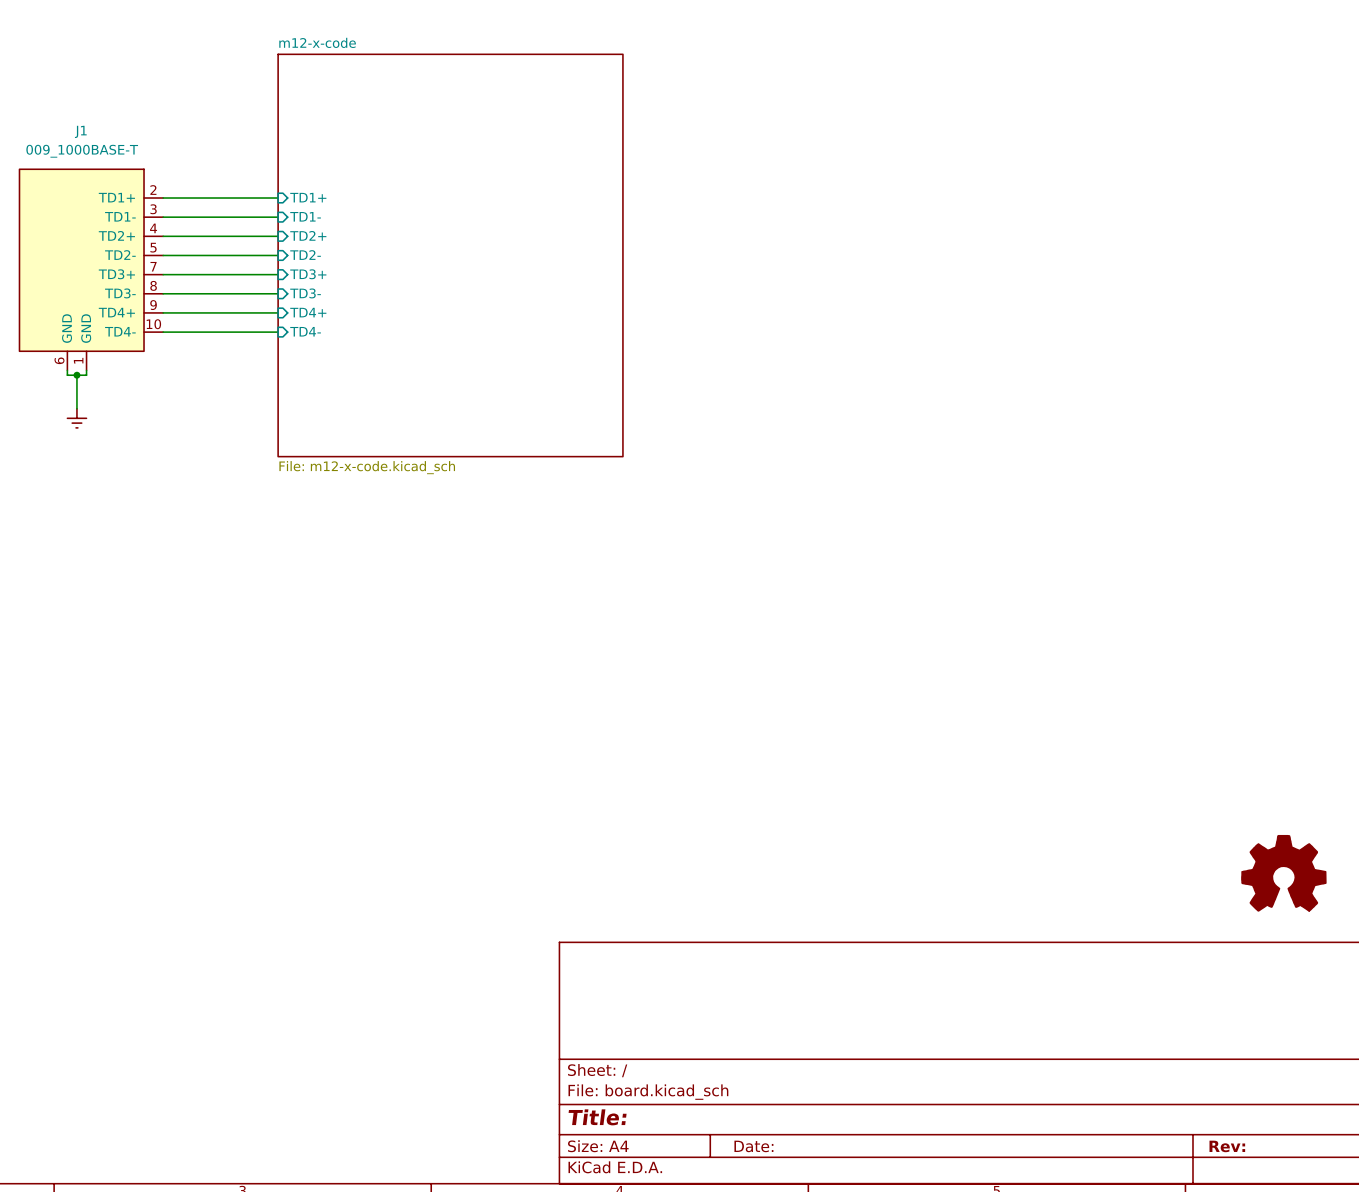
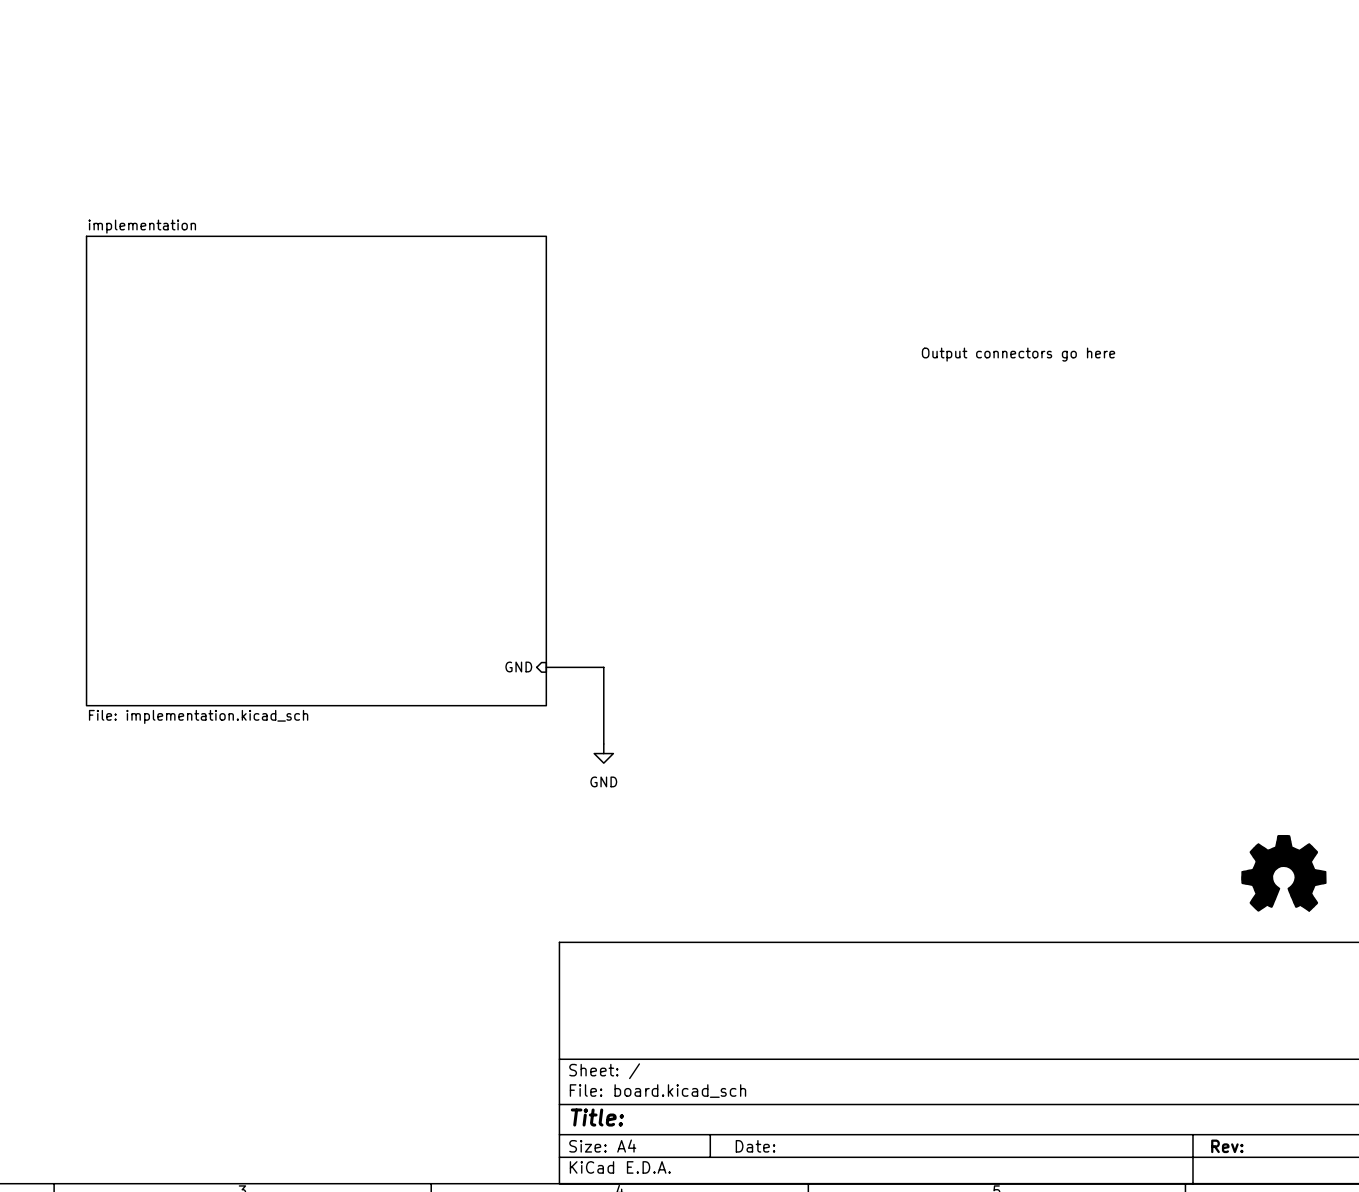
sheet pin: TD1+ (308, 197) -> none
wire: (163, 198) (278, 198) -> none
sheet pin: TD1- (305, 216) -> none
wire: (163, 217) (278, 217) -> none
sheet pin: TD2+ (308, 235) -> none
wire: (163, 255) (278, 255) -> none
sheet pin: TD2- (305, 255) -> none
sheet m12-x-code: File: m12-x-code.kicad_sch (450, 255) -> none
J1: 009_1000BASE-T (91, 269) -> none
wire: (163, 274) (278, 274) -> none
sheet pin: TD3+ (308, 274) -> none
wire: (163, 293) (278, 293) -> none
sheet pin: TD3- (305, 293) -> none
wire: (163, 312) (278, 312) -> none
sheet pin: TD4+ (308, 312) -> none
sheet pin: TD4- (305, 331) -> none
wire: (163, 332) (278, 332) -> none
text: none -> Output connectors go here (1018, 354)
wire: (67, 370) (67, 375) (86, 375) (86, 370) -> none
wire: (76, 375) (76, 408) -> none
junction: (76, 375) -> none
power symbol: (76, 418) -> none
sheet implementation: none -> File: implementation.kicad_sch (316, 471)
sheet pin: none -> GND (518, 667)
wire: none -> (546, 667) (603, 667) (603, 743)
power symbol: none -> GND (603, 753)

